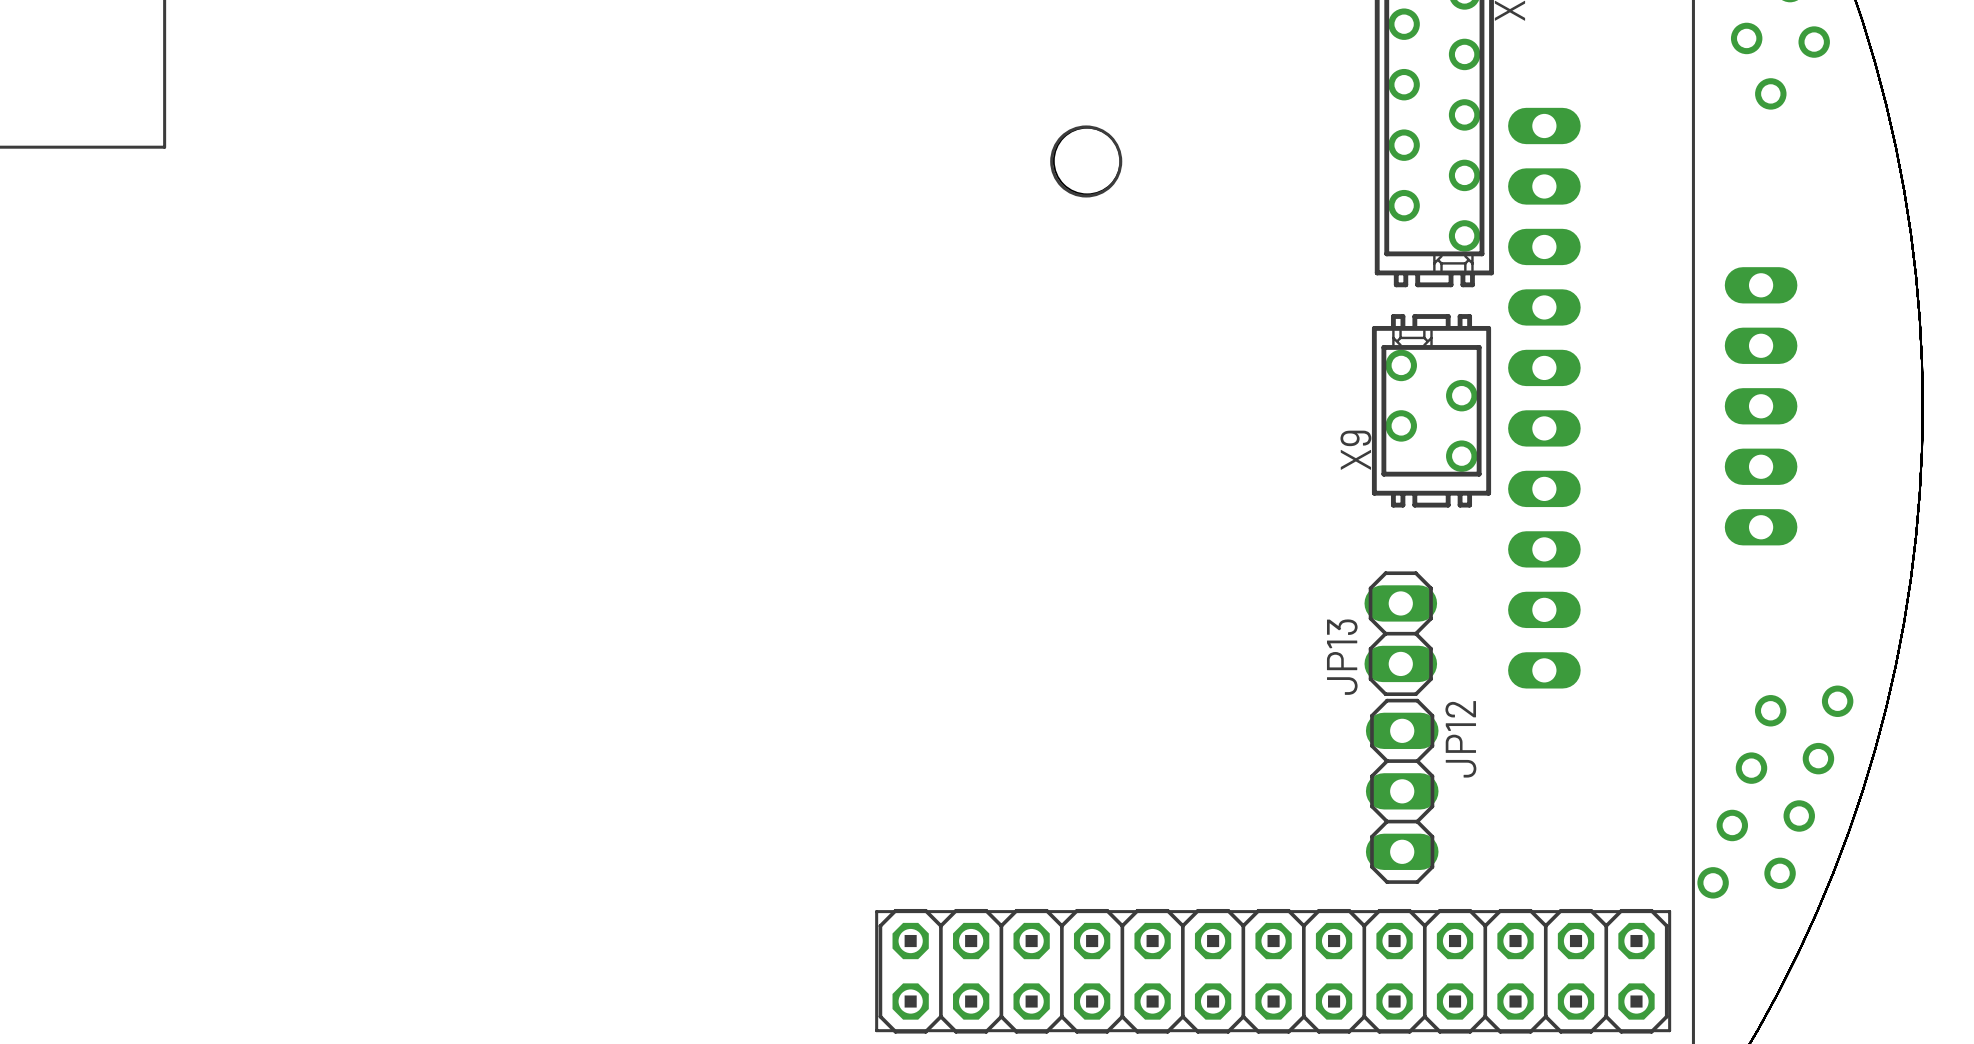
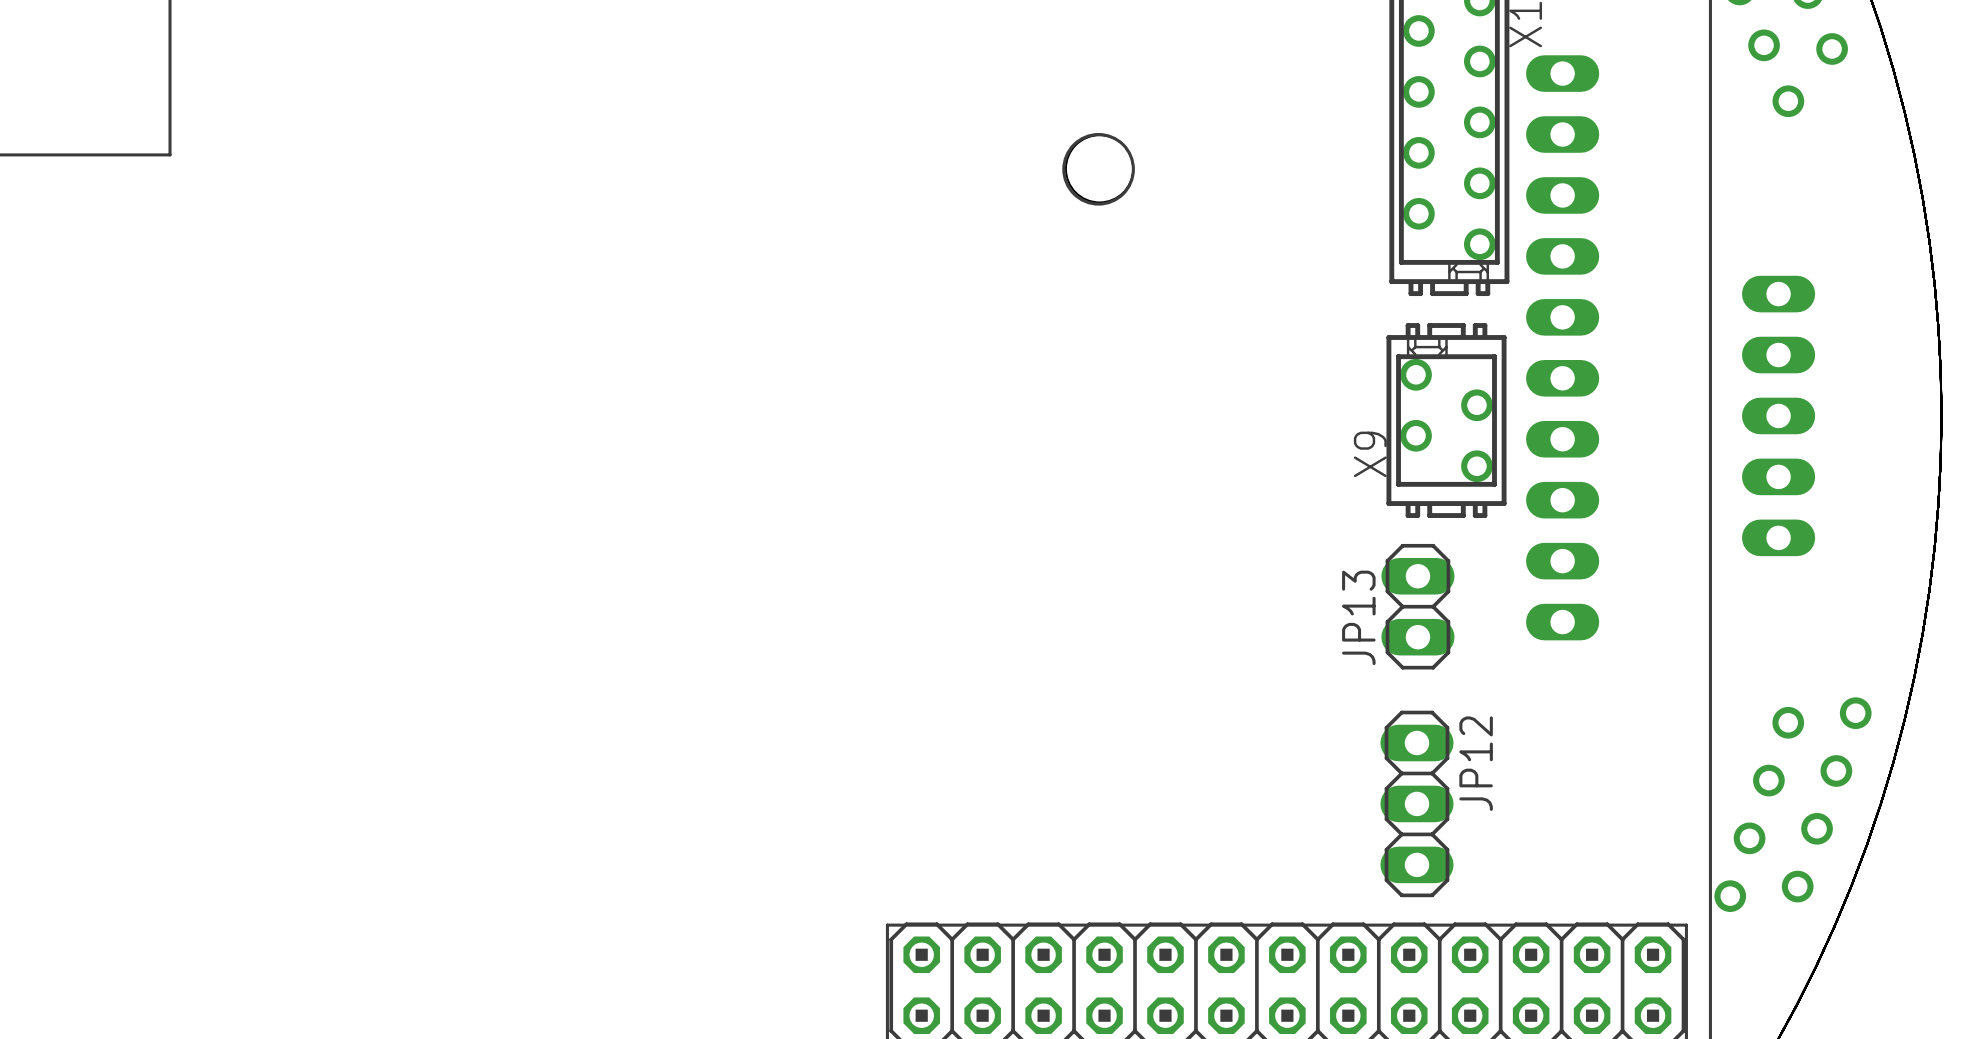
part position: (1544, 398) -> (1562, 347)
JP13 position: (1400, 633) -> (1417, 606)

